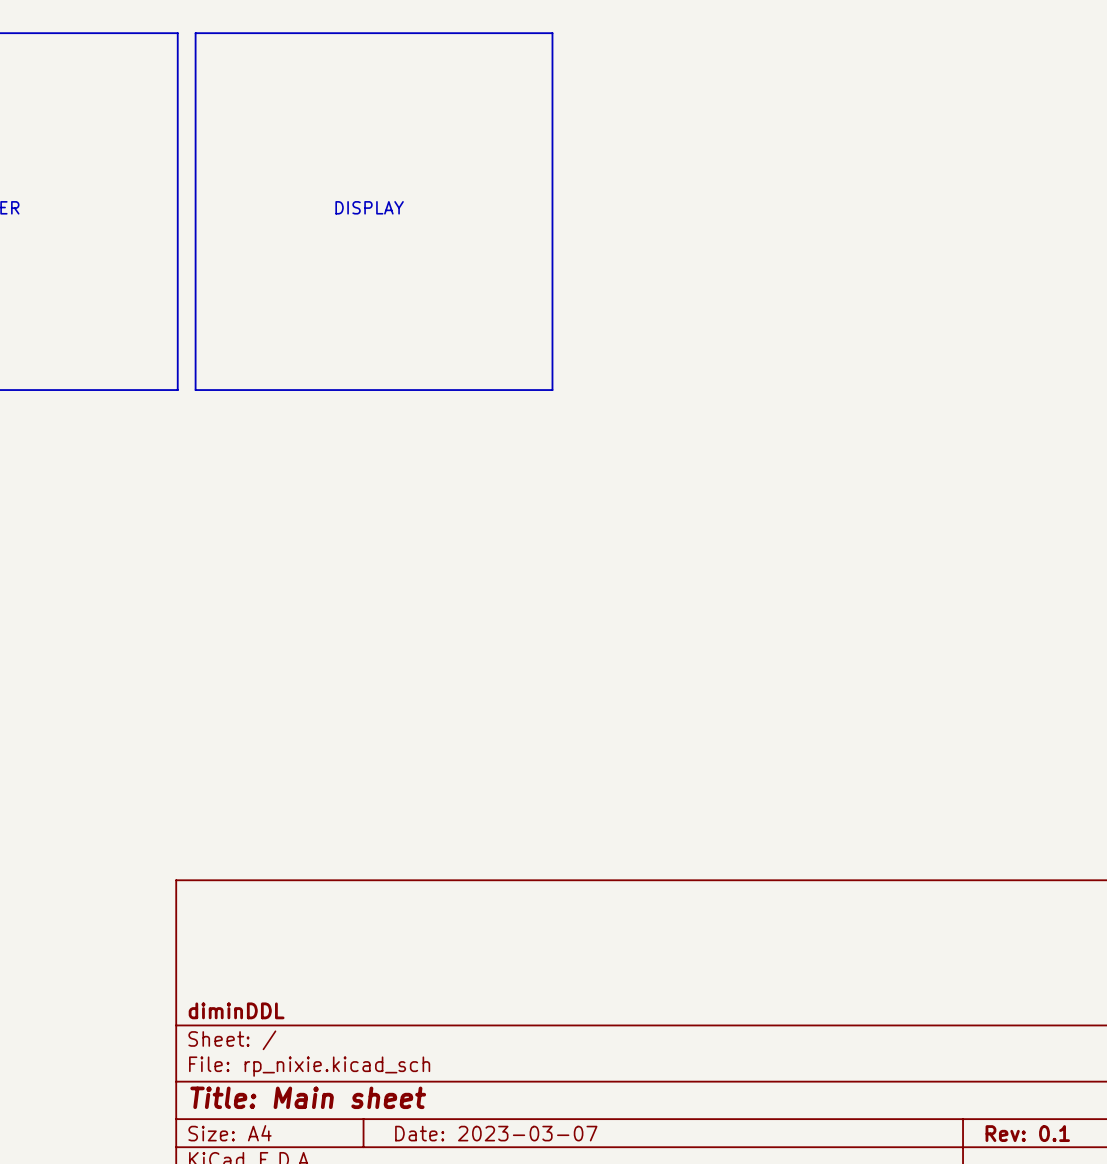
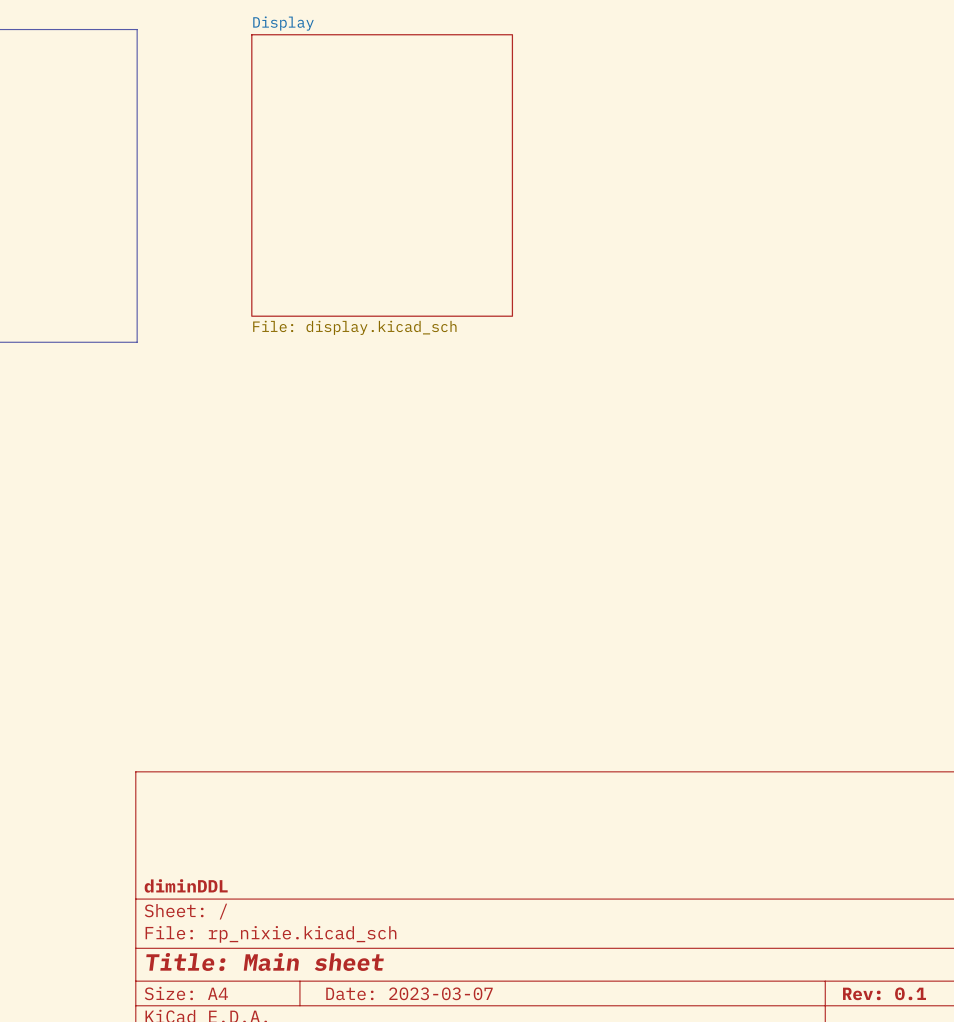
line: (195, 33) (195, 390) (552, 390) (552, 33) (195, 33) -> none
sheet Display: none -> File: display.kicad_sch (382, 175)
text: DISPLAY (369, 207) -> none

